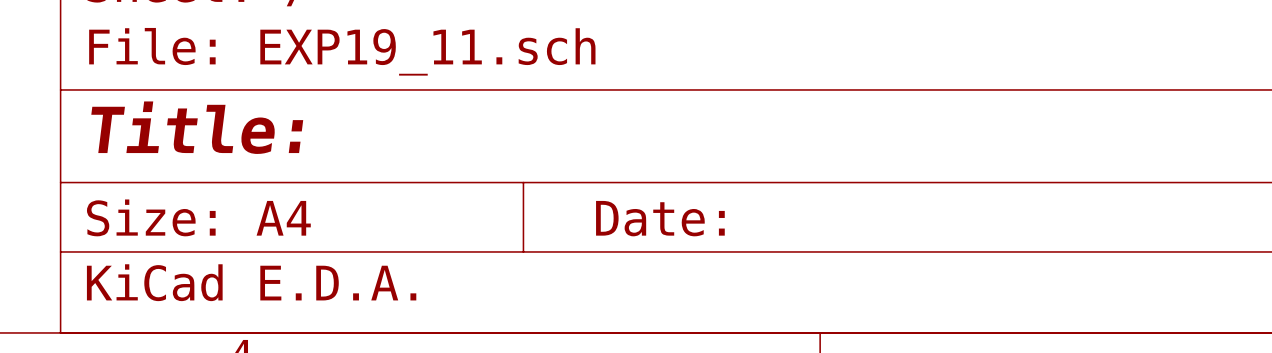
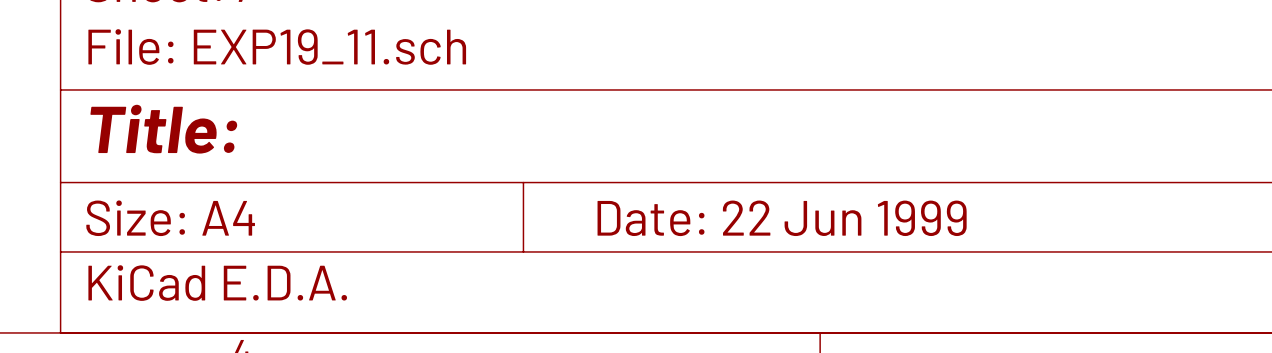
title block: Date: (660, 218) -> Date: 22 Jun 1999 (782, 218)

